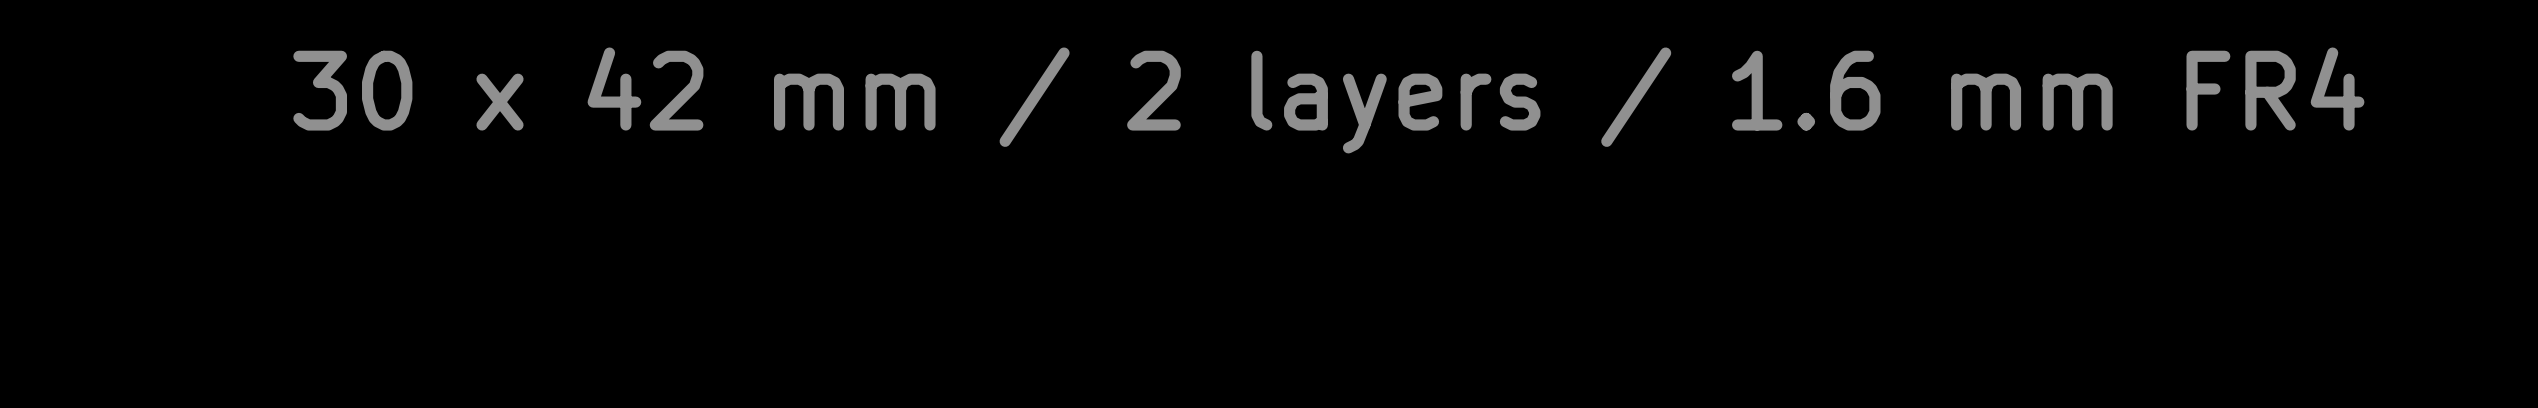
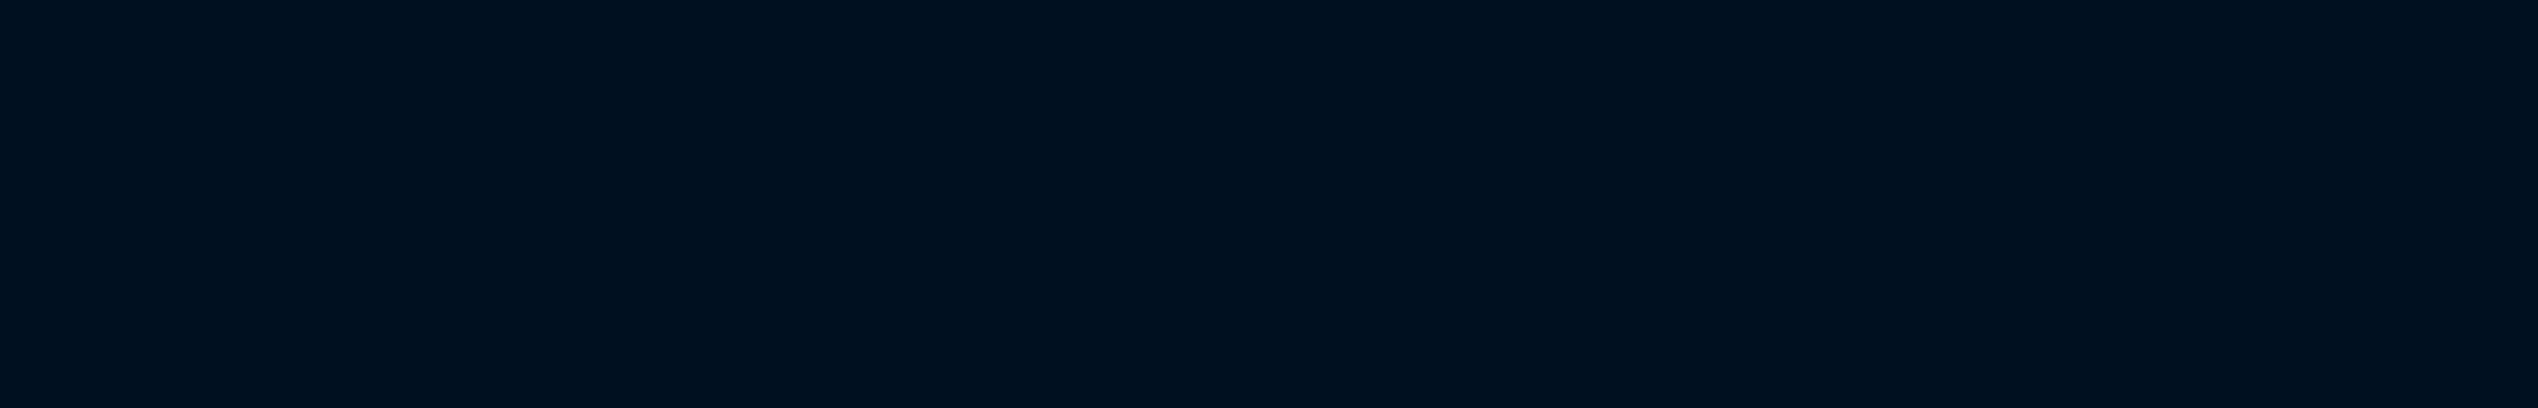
text: 30 x 42 mm / 2 layers / 1.6 mm FR4 (1328, 100) -> none

